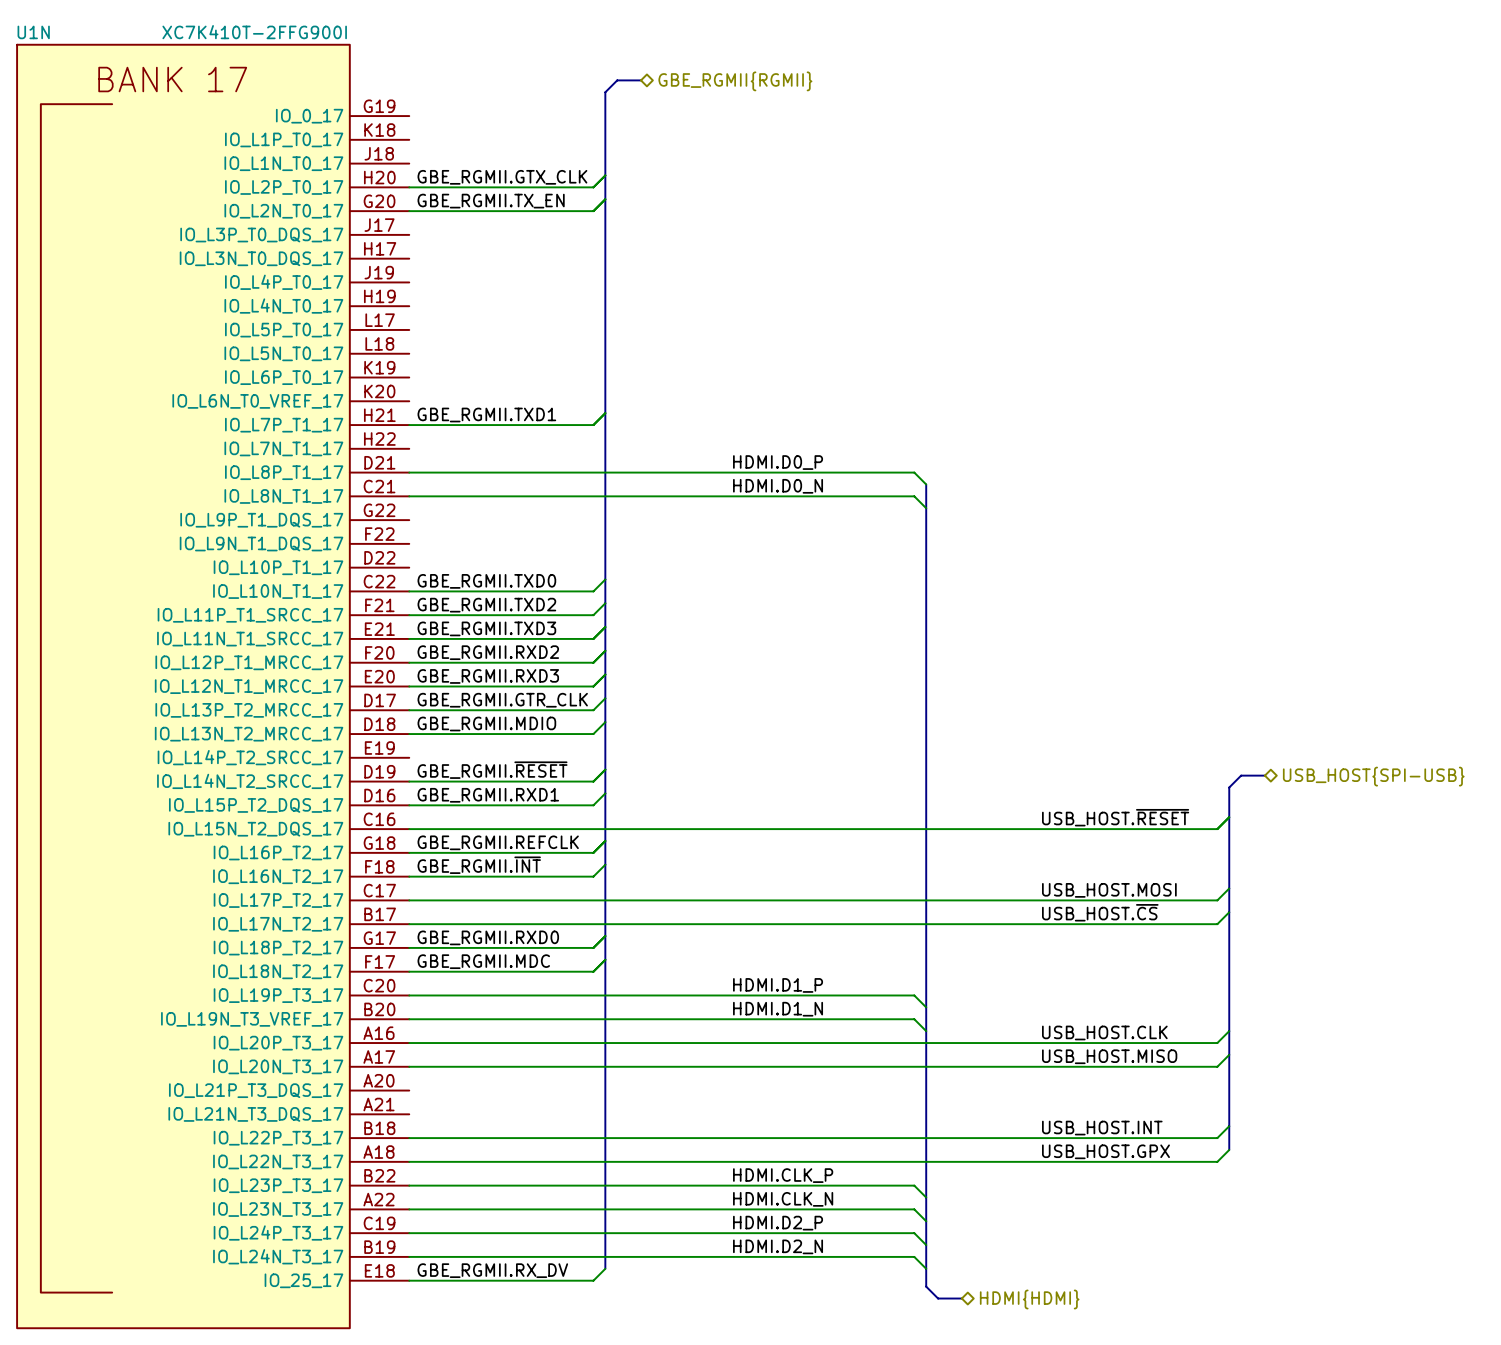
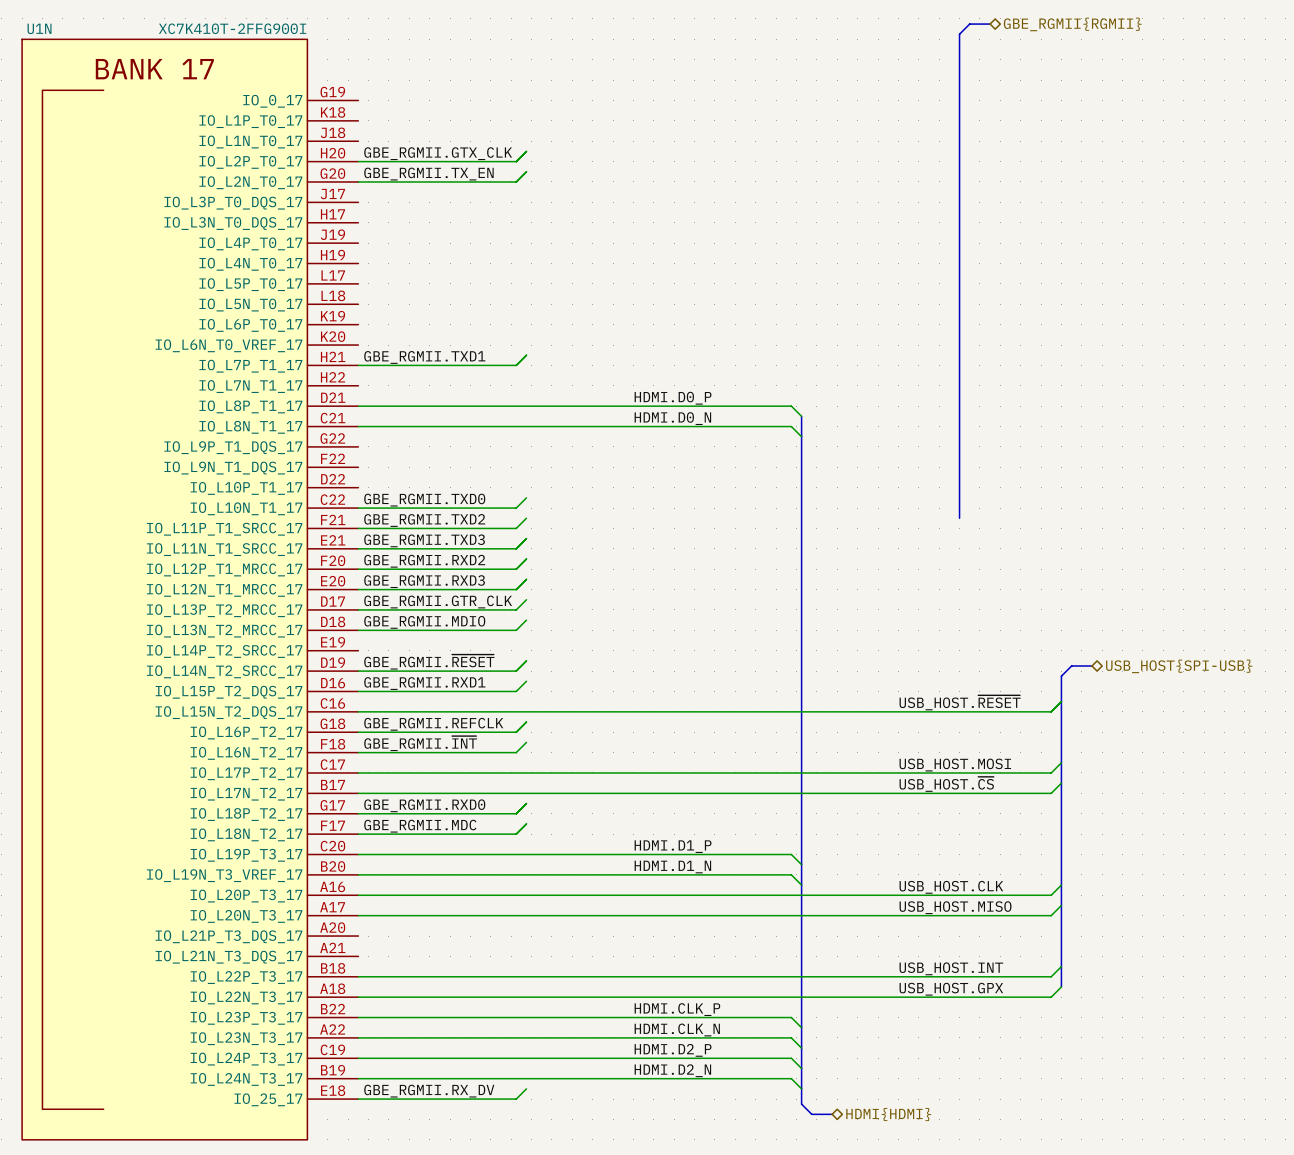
bus: none -> (990, 24) (969, 24) (959, 34) (959, 518)
hierarchical label: none -> GBE_RGMII{RGMII} (1072, 24)
bus: (640, 80) (617, 80) (605, 92) (605, 1268) -> none
hierarchical label: GBE_RGMII{RGMII} (735, 81) -> none

